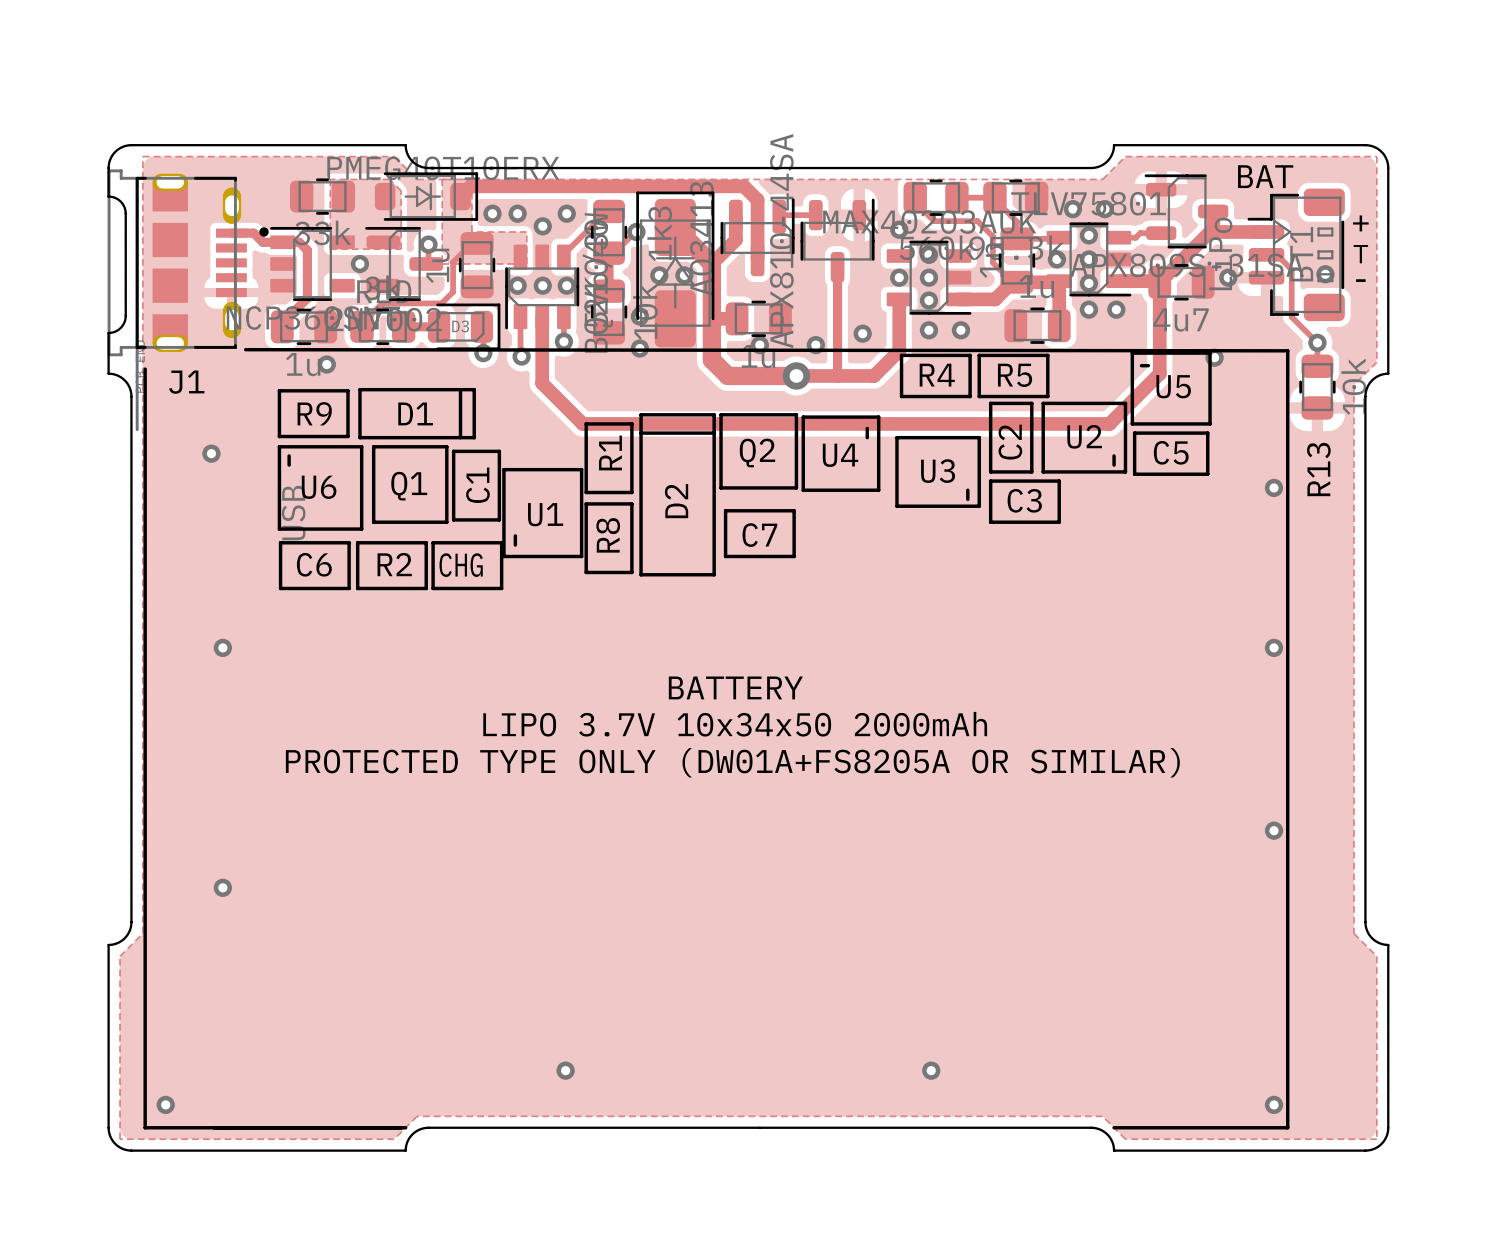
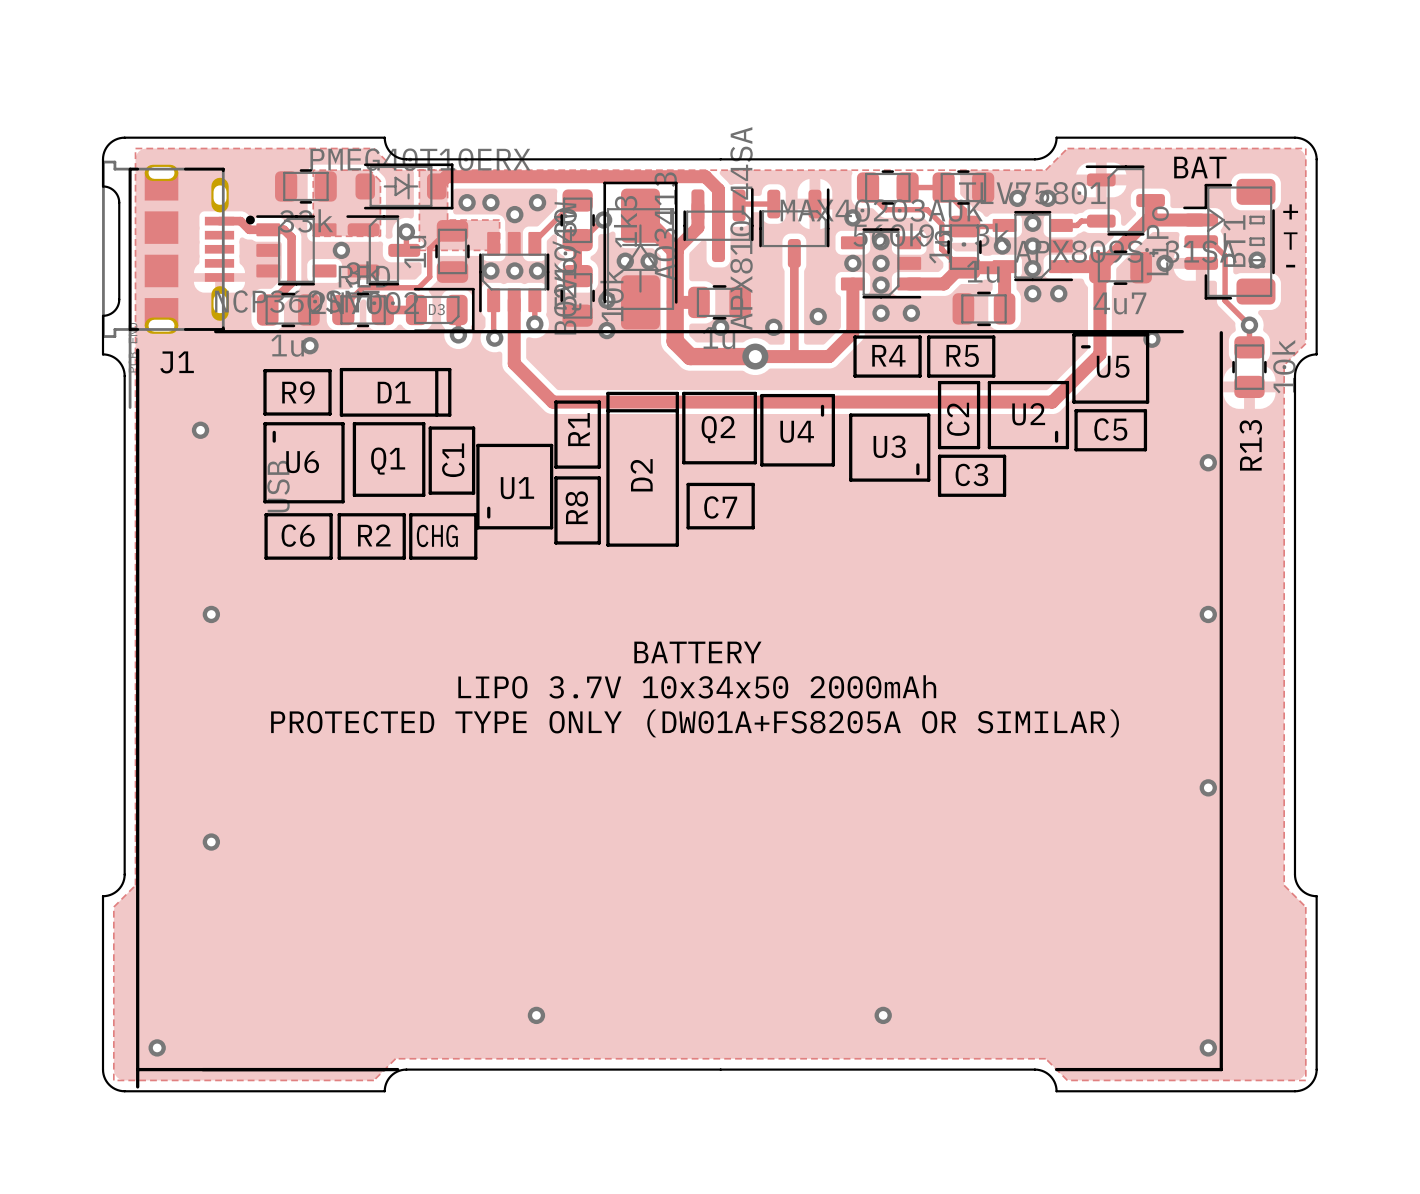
line: none -> (215, 331) (1182, 331)
line: (245, 349) (1287, 350) -> none
line: none -> (137, 1069) (137, 1086)
line: none -> (384, 1069) (397, 1069)

